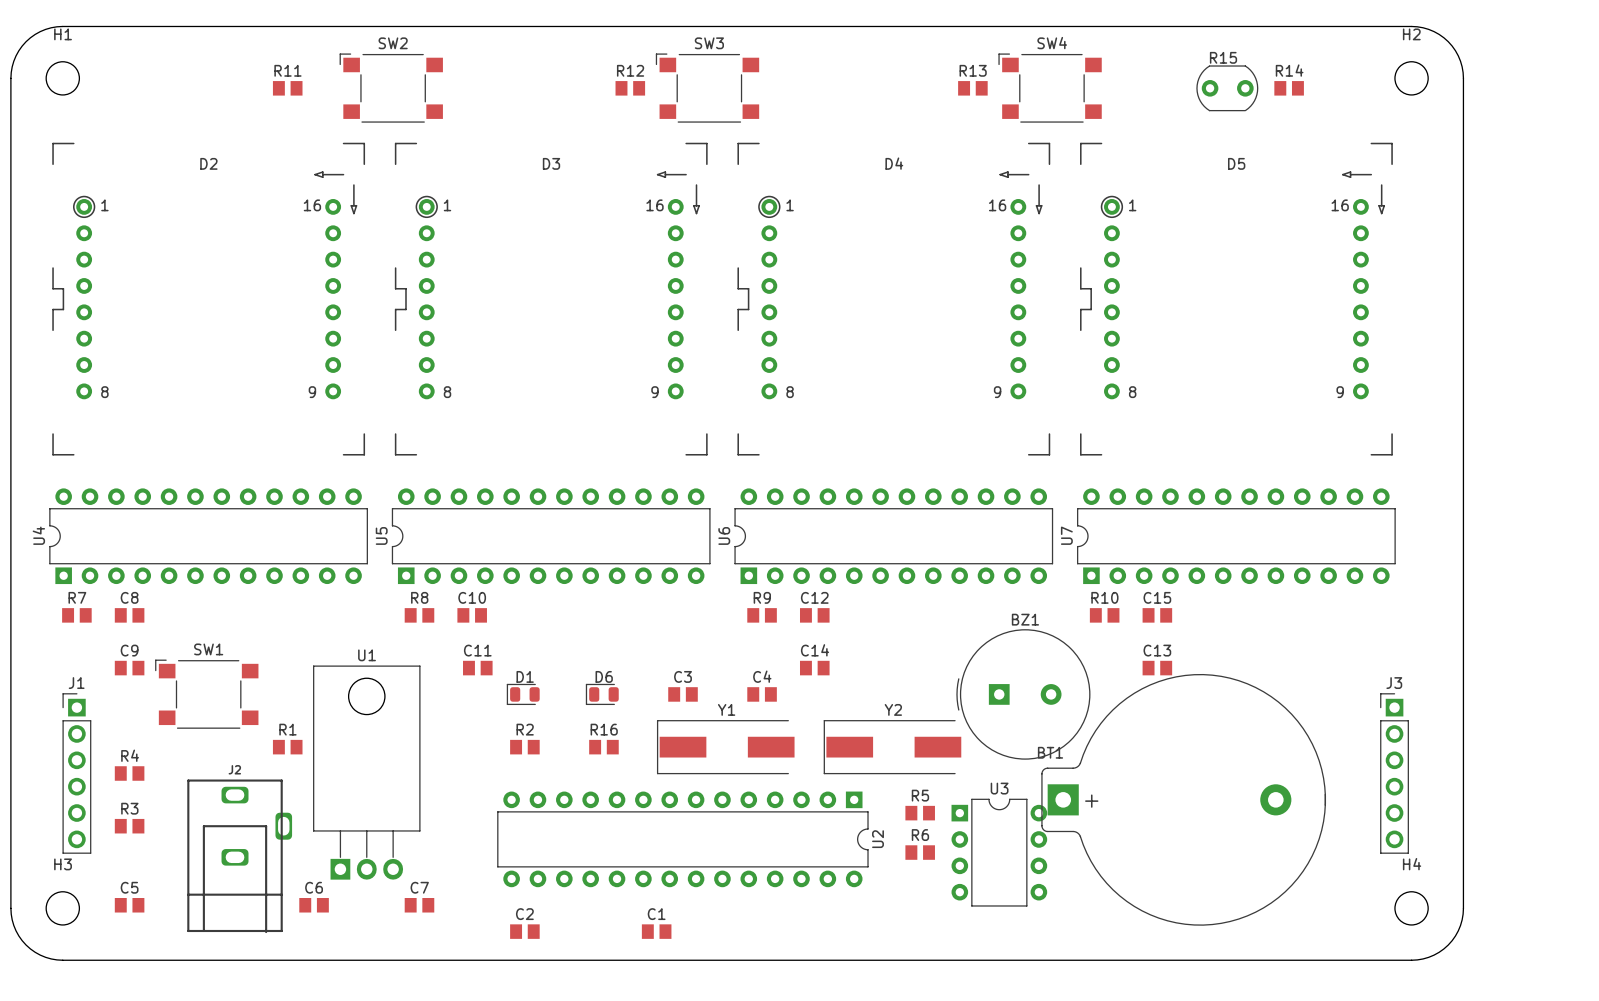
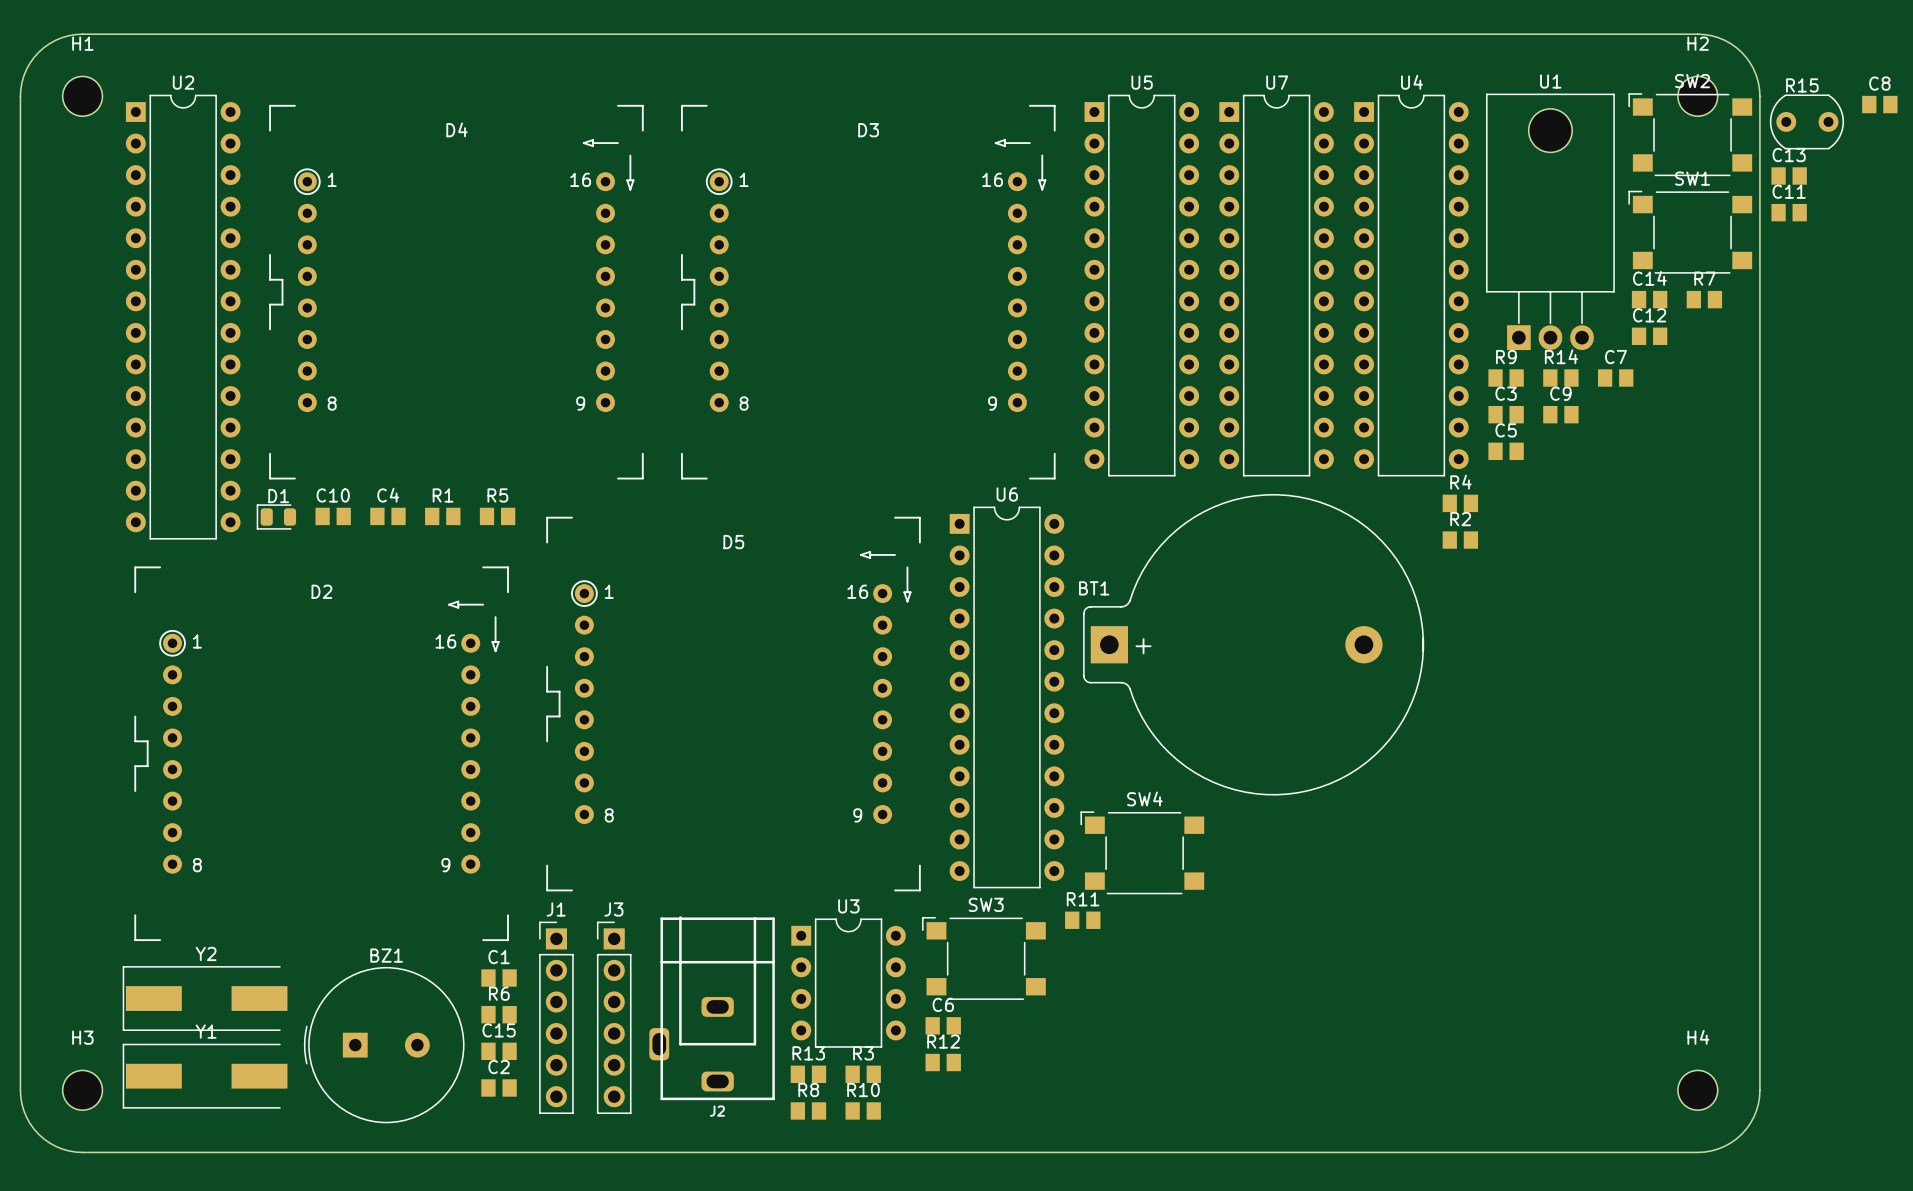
R11 position: (287, 88) -> (1082, 920)
SW2 position: (391, 88) -> (1690, 134)
R12 position: (630, 88) -> (943, 1062)
SW3 position: (707, 88) -> (983, 958)
R13 position: (972, 88) -> (808, 1074)
SW4 position: (1050, 88) -> (1142, 852)
R15 position: (1227, 88) -> (1806, 121)
R14 position: (1289, 88) -> (1560, 378)
D2 position: (208, 299) -> (321, 753)
D3 position: (551, 299) -> (868, 292)
D4 position: (893, 299) -> (456, 292)
D5 position: (1236, 299) -> (733, 704)
U4 rotation: 0° (208, 536) -> 90° clockwise (1411, 285)
U4 position: (208, 536) -> (1411, 285)
U5 rotation: 0° (551, 536) -> 90° clockwise (1141, 285)
U5 position: (551, 536) -> (1141, 285)
U6 rotation: 0° (893, 536) -> 90° clockwise (1006, 697)
U7 rotation: 0° (1236, 536) -> 90° clockwise (1276, 285)
U7 position: (1236, 536) -> (1276, 285)
R7 position: (76, 615) -> (1704, 299)
C8 position: (129, 615) -> (1879, 104)
R8 position: (419, 615) -> (808, 1110)
C10 position: (472, 615) -> (333, 516)
R9 position: (762, 615) -> (1506, 378)
C12 position: (814, 615) -> (1649, 336)
R10 position: (1104, 615) -> (863, 1110)
C15 position: (1157, 615) -> (499, 1051)
C9 position: (129, 668) -> (1560, 414)
C11 position: (477, 668) -> (1789, 212)
C14 position: (814, 668) -> (1649, 299)
C13 position: (1157, 668) -> (1789, 175)
SW1 position: (206, 694) -> (1690, 232)
D1 position: (523, 694) -> (276, 516)
D6: (602, 694) -> none
C3 position: (683, 694) -> (1506, 414)
C4 position: (762, 694) -> (387, 516)
BZ1 position: (1023, 694) -> (384, 1045)
R1 position: (287, 747) -> (442, 516)
R2 position: (524, 747) -> (1460, 540)
R16: (603, 747) -> none
Y1 position: (725, 747) -> (205, 1076)
Y2 position: (892, 747) -> (205, 998)
U1 position: (366, 772) -> (1550, 221)
J1 position: (76, 773) -> (556, 1017)
R4 position: (129, 773) -> (1460, 503)
J3 position: (1394, 773) -> (614, 1017)
BT1 position: (1183, 799) -> (1253, 644)
R5 position: (920, 813) -> (497, 516)
R3 position: (129, 826) -> (863, 1074)
U2 rotation: 0° (682, 839) -> 90° counterclockwise (183, 317)
U2 position: (682, 839) -> (183, 317)
R6 position: (920, 852) -> (499, 1014)
U3 position: (999, 852) -> (848, 983)
J2 rotation: 0° (239, 856) -> 180° (712, 1008)
J2 position: (239, 856) -> (712, 1008)
C5 position: (129, 905) -> (1506, 451)
C6 position: (314, 905) -> (943, 1025)
C7 position: (419, 905) -> (1615, 378)
C2 position: (524, 931) -> (499, 1087)
C1 position: (656, 931) -> (499, 978)

